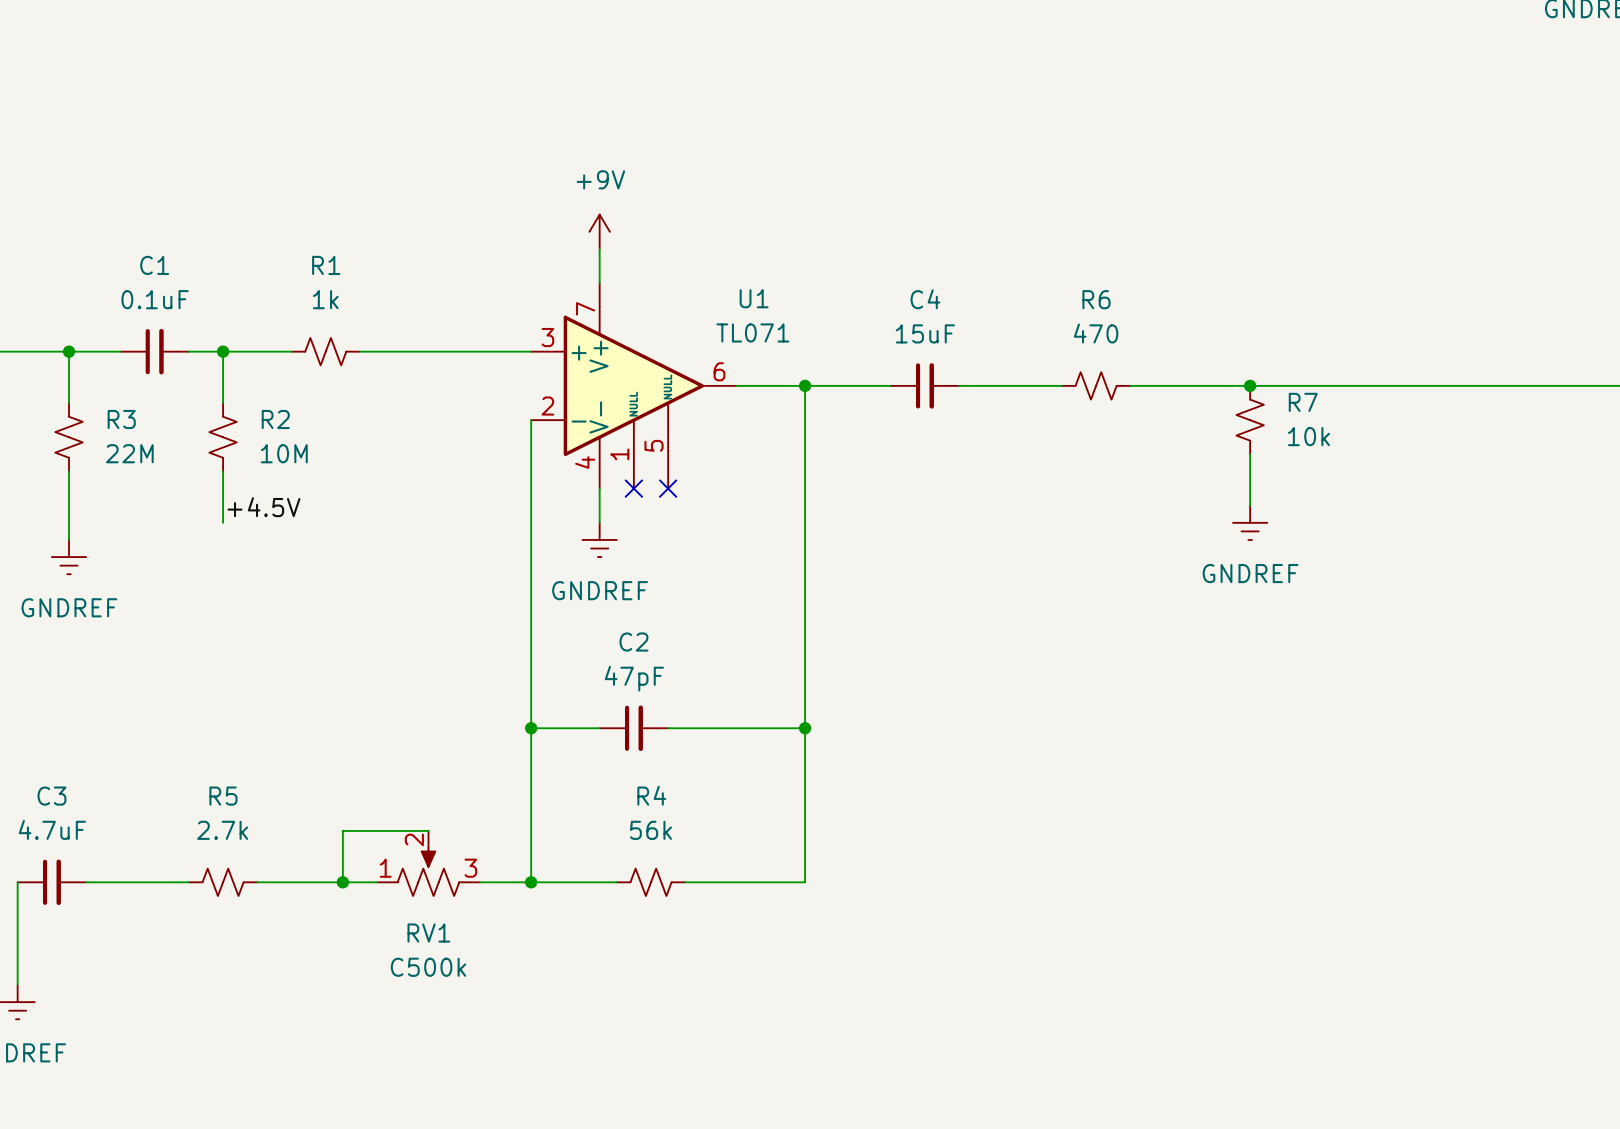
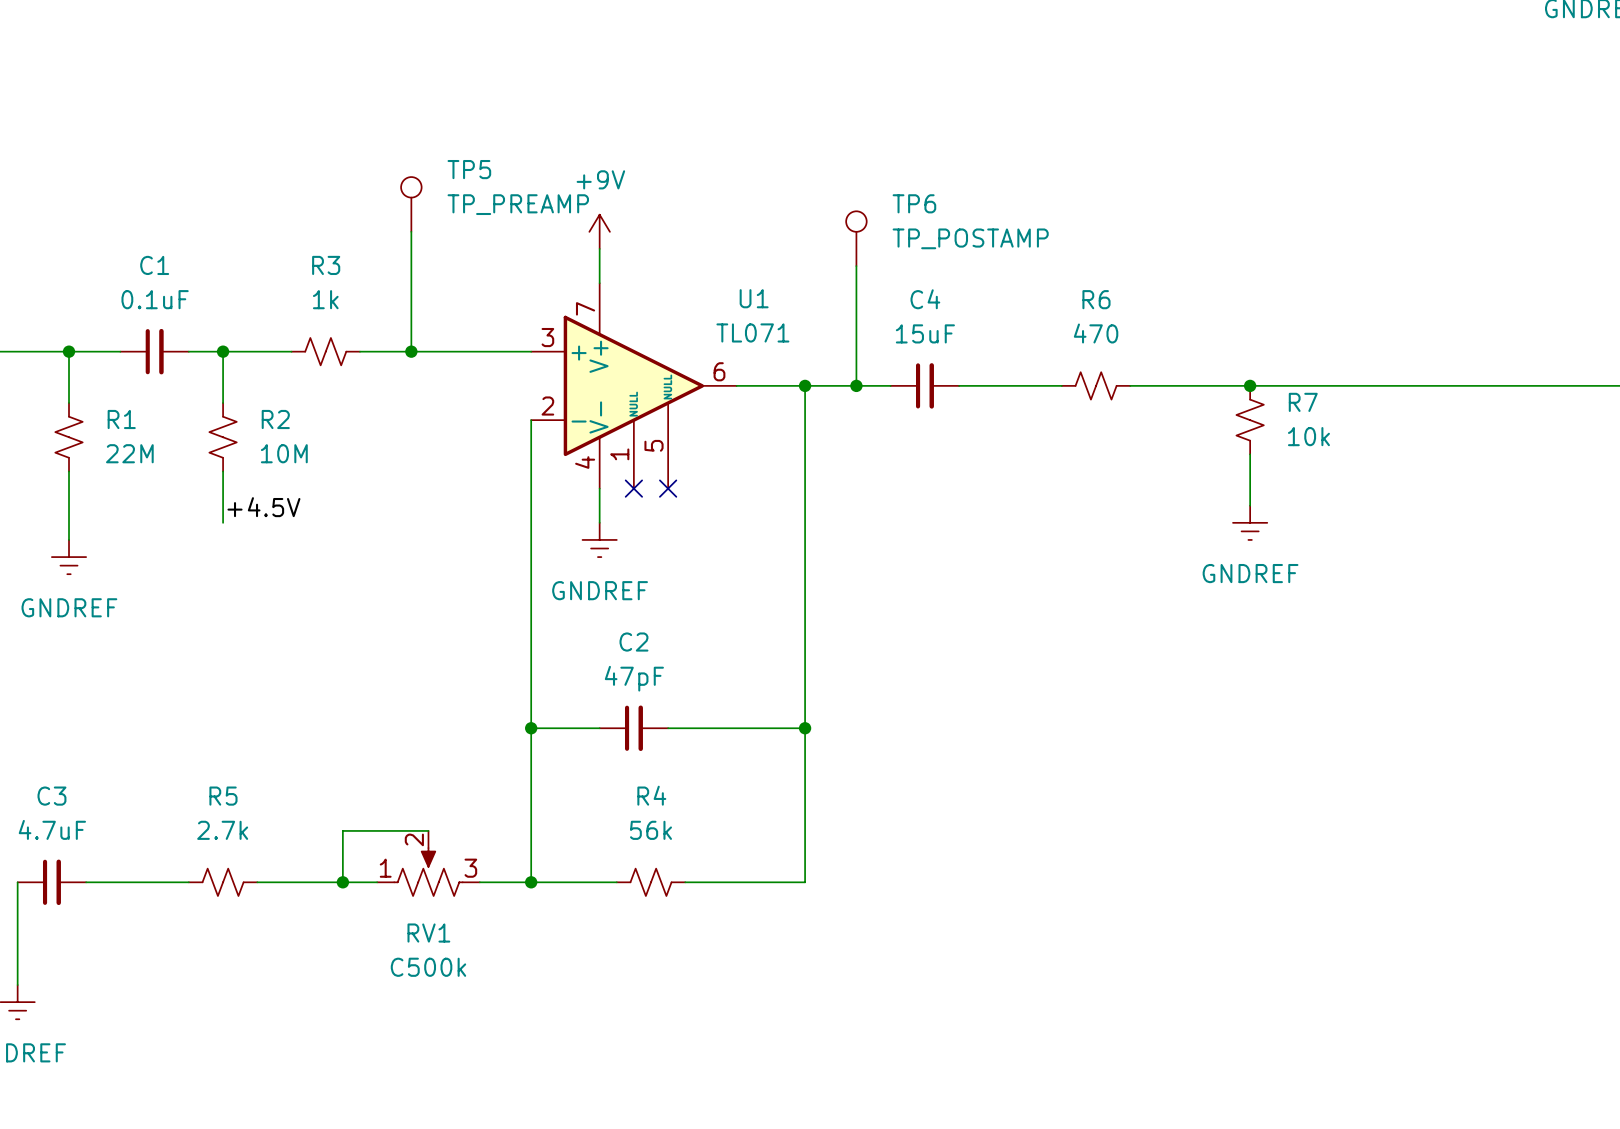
TP5: none -> TP_PREAMP (411, 204)
wire: none -> (411, 231) (411, 351)
TP6: none -> TP_POSTAMP (856, 238)
R1 name: R1 (326, 265) -> R3 (326, 265)
wire: none -> (856, 266) (856, 385)
junction: none -> (411, 351)
junction: none -> (856, 385)
R3 name: R3 (121, 419) -> R1 (121, 419)

